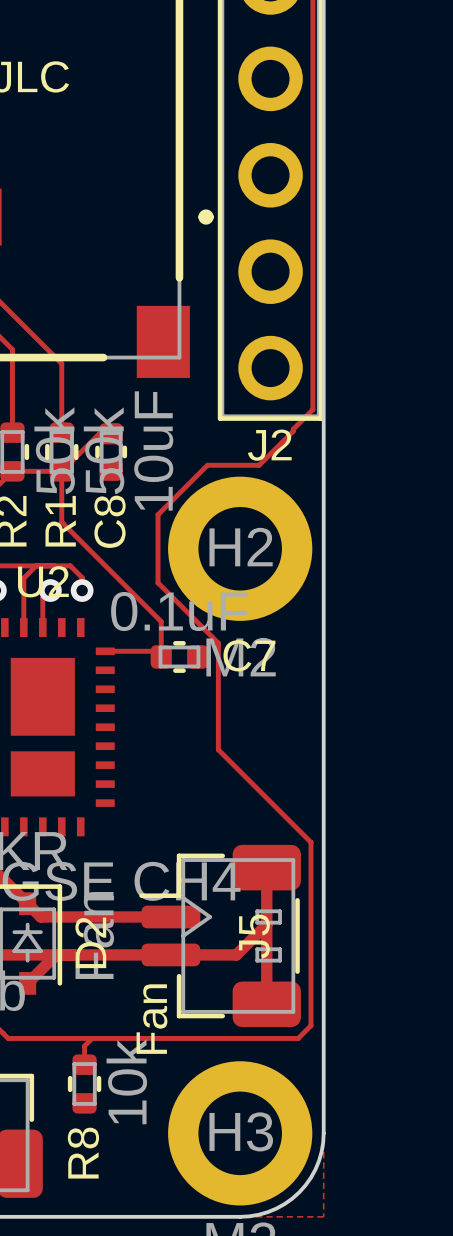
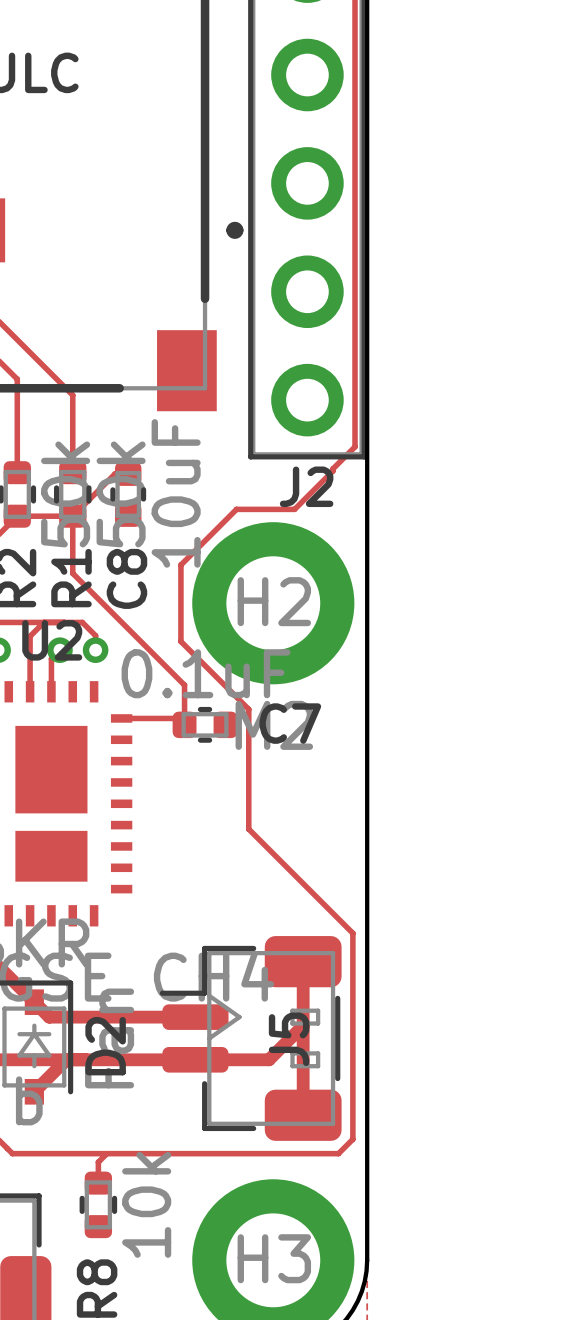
text: Fan (151, 1019) -> none

